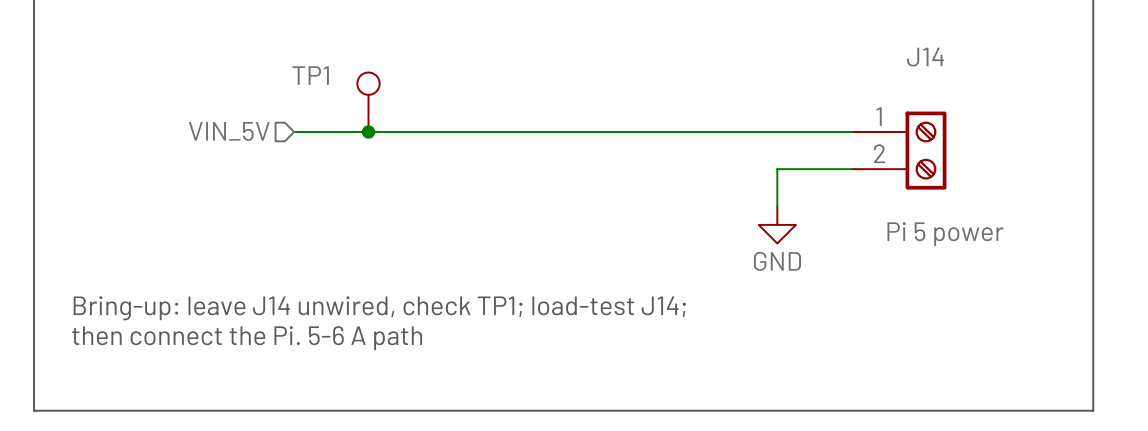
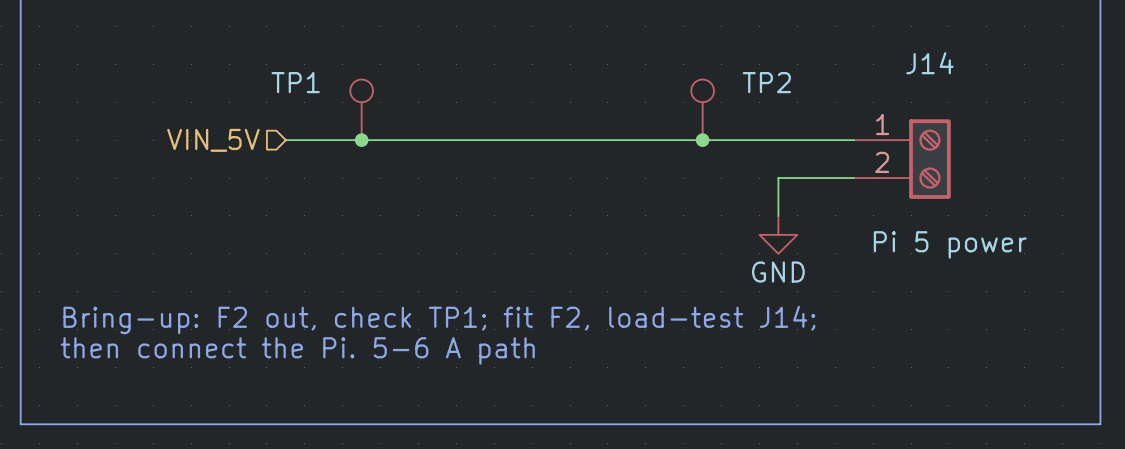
TP2: none -> (702, 109)
junction: none -> (702, 140)
text: Bring-up: leave J14 unwired, check TP1; load-test J14; (379, 308) -> Bring-up: F2 out, check TP1; fit F2, load-test J14; (439, 319)

